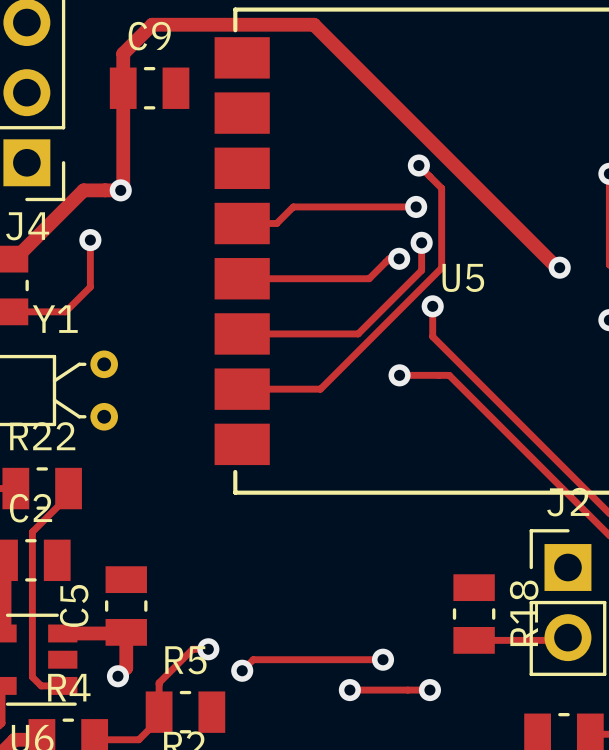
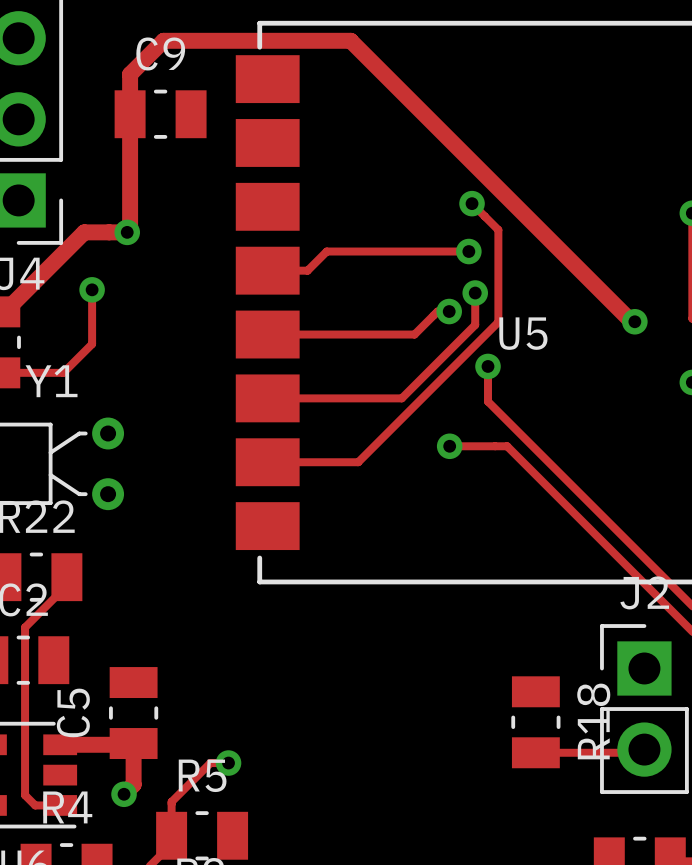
track: (383, 659) (253, 659) (242, 670) -> none
via: (383, 659) -> none
via: (242, 670) -> none
track: (349, 690) (429, 690) -> none
via: (349, 690) -> none
via: (429, 690) -> none

